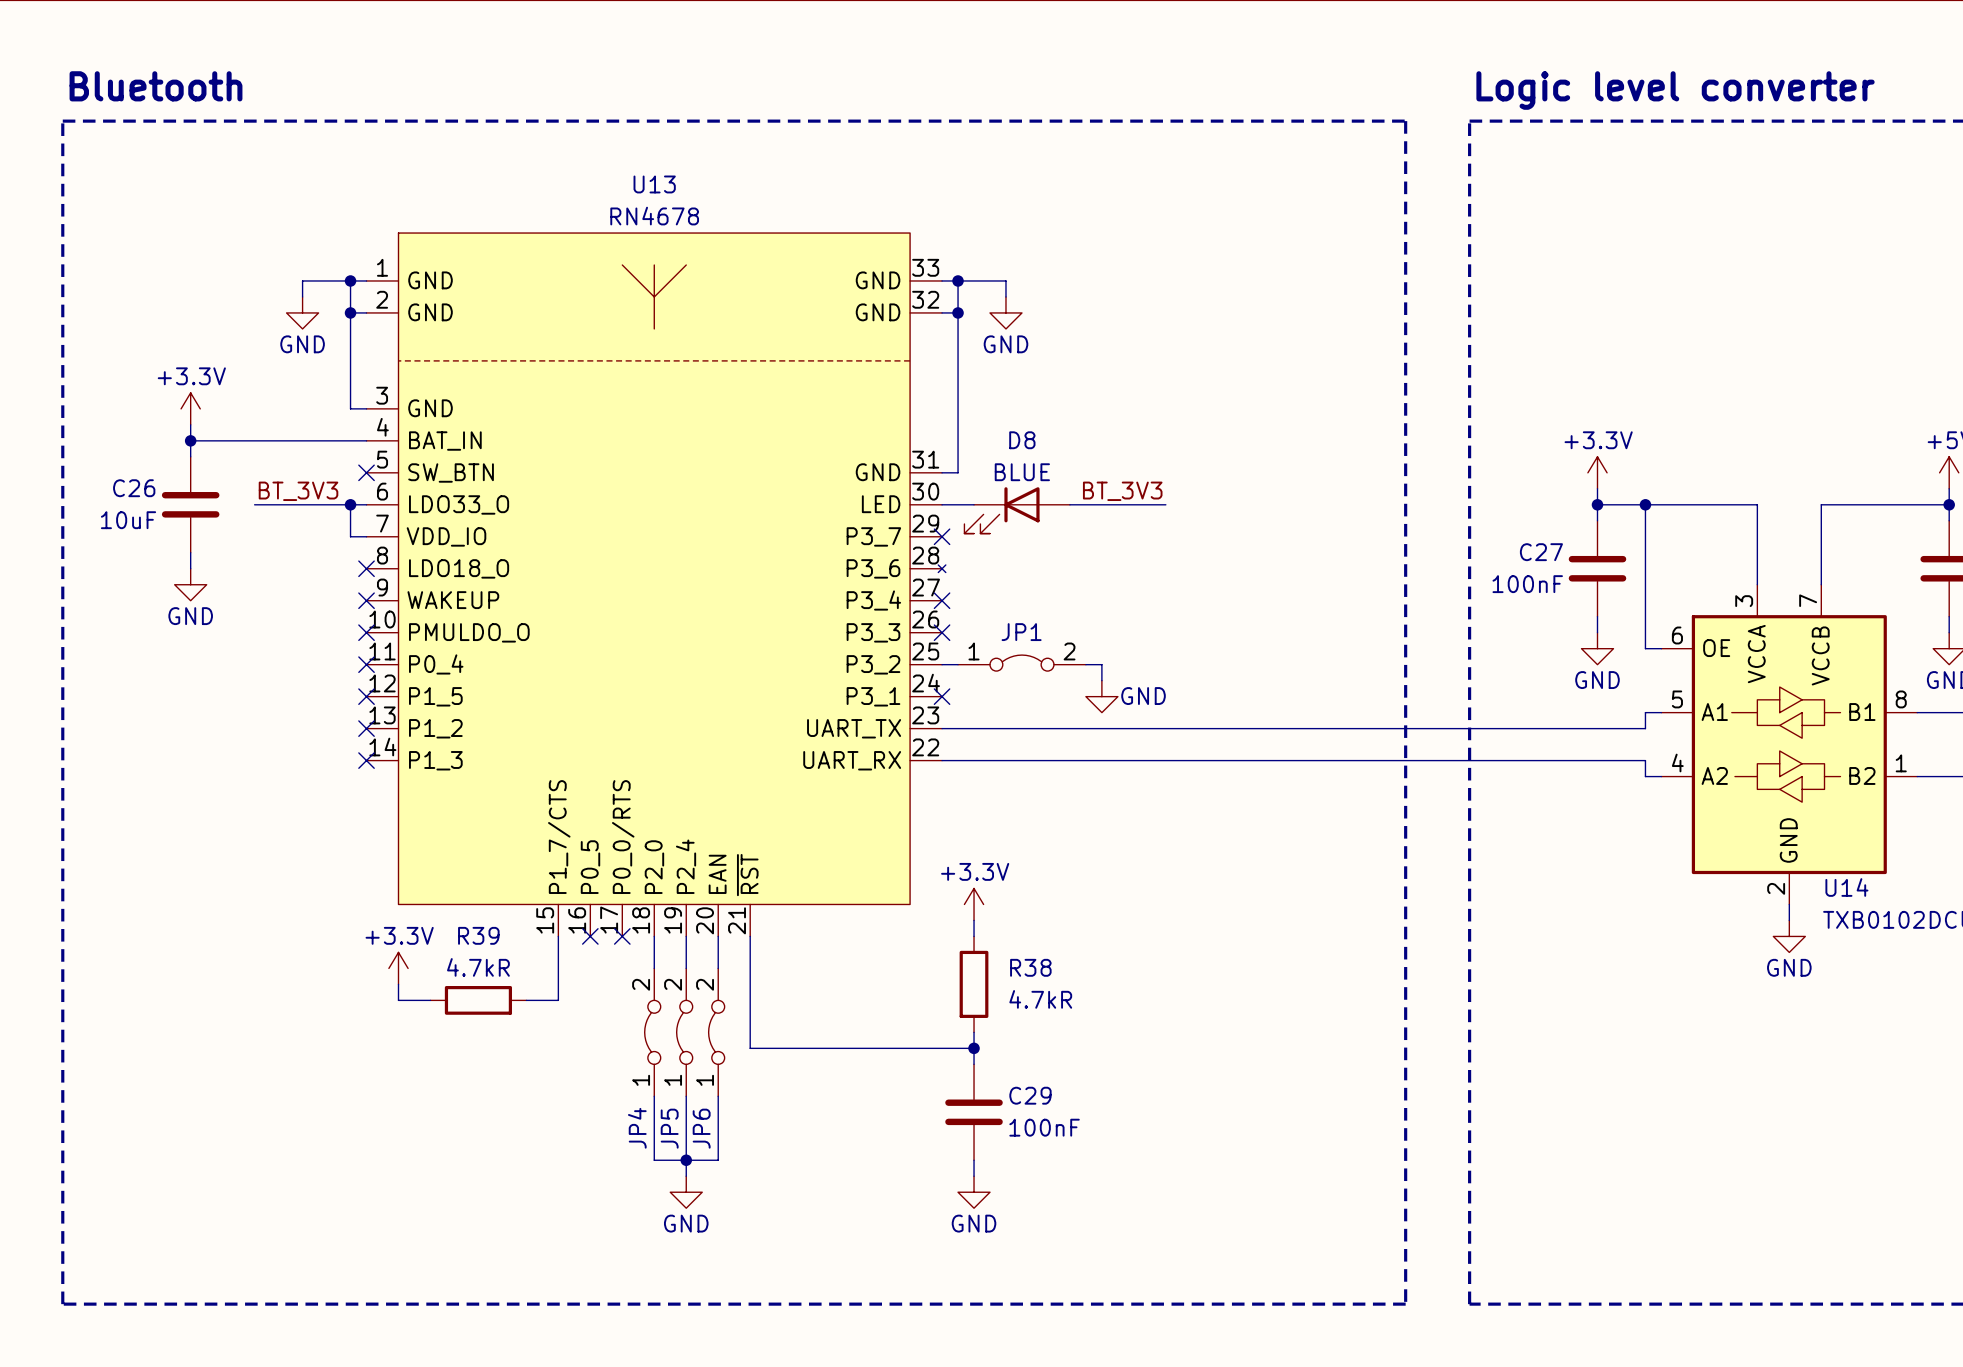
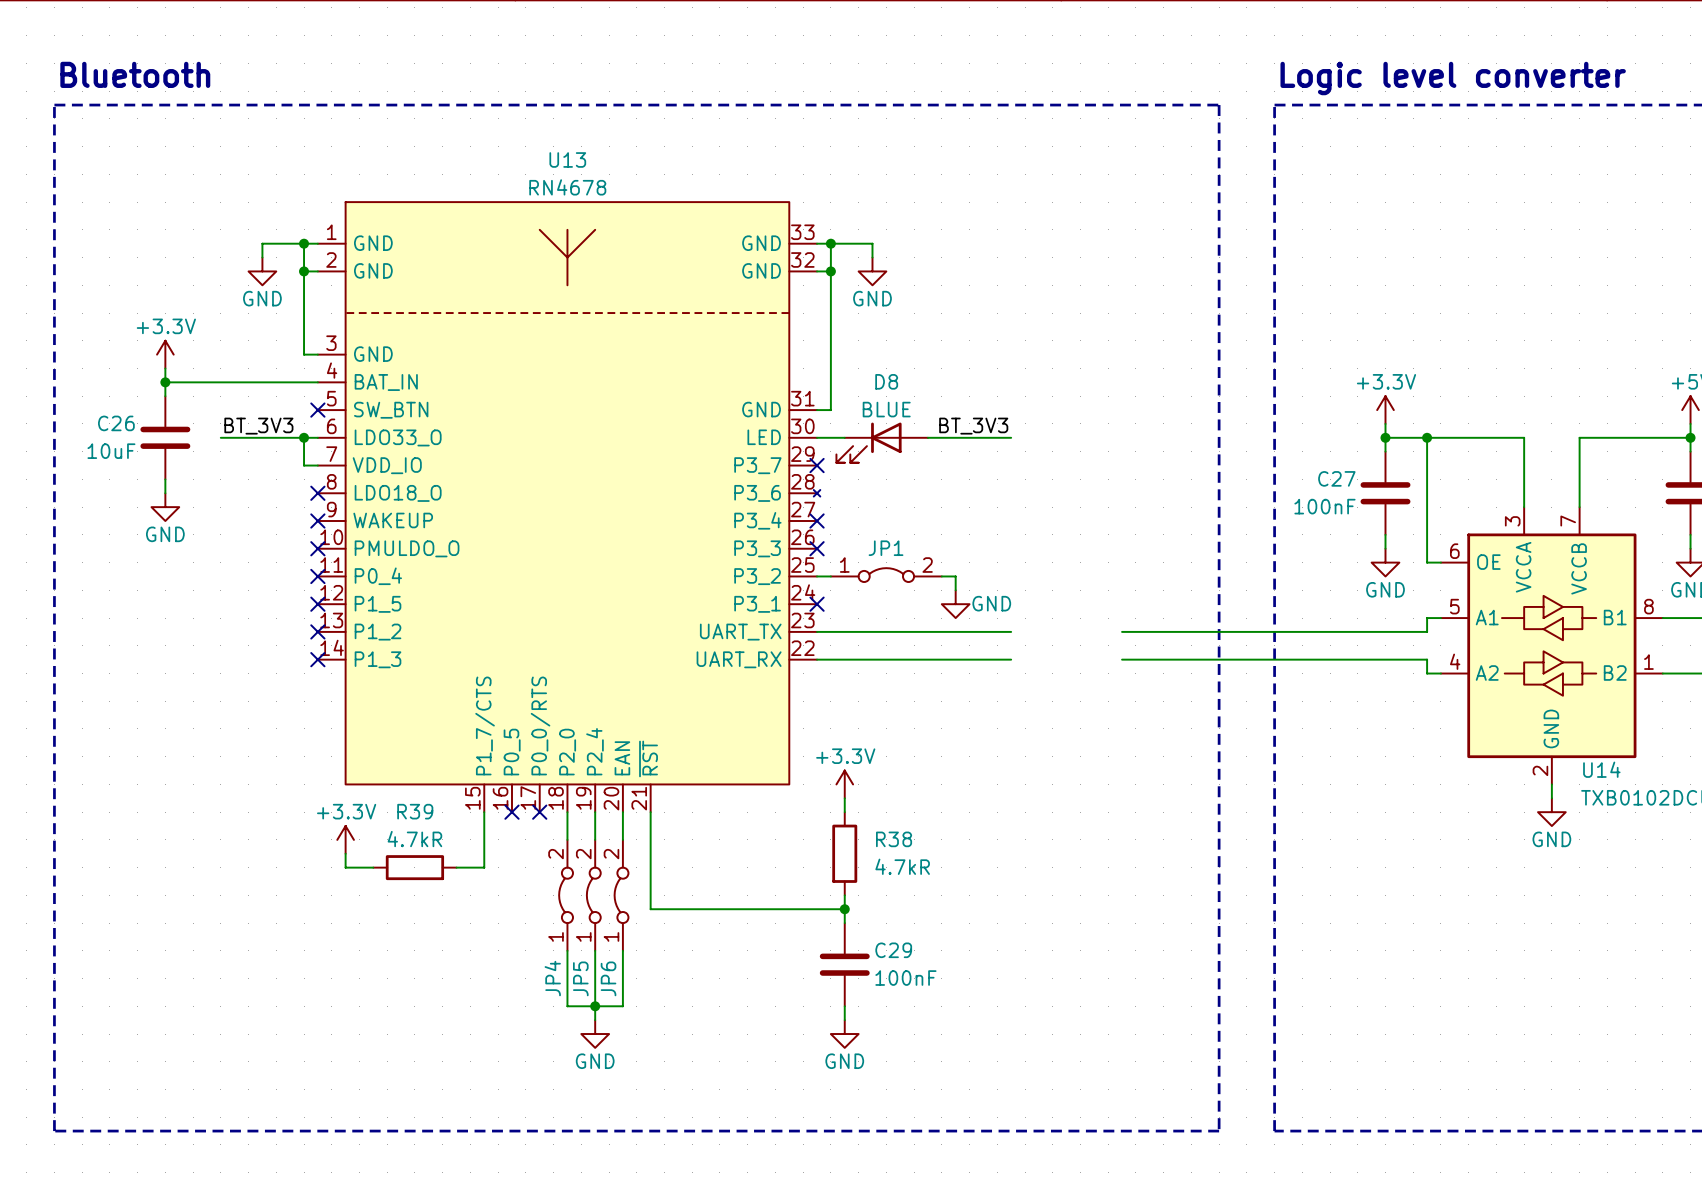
wire: (1165, 728) (1293, 728) -> none
wire: (1165, 760) (1293, 760) -> none

